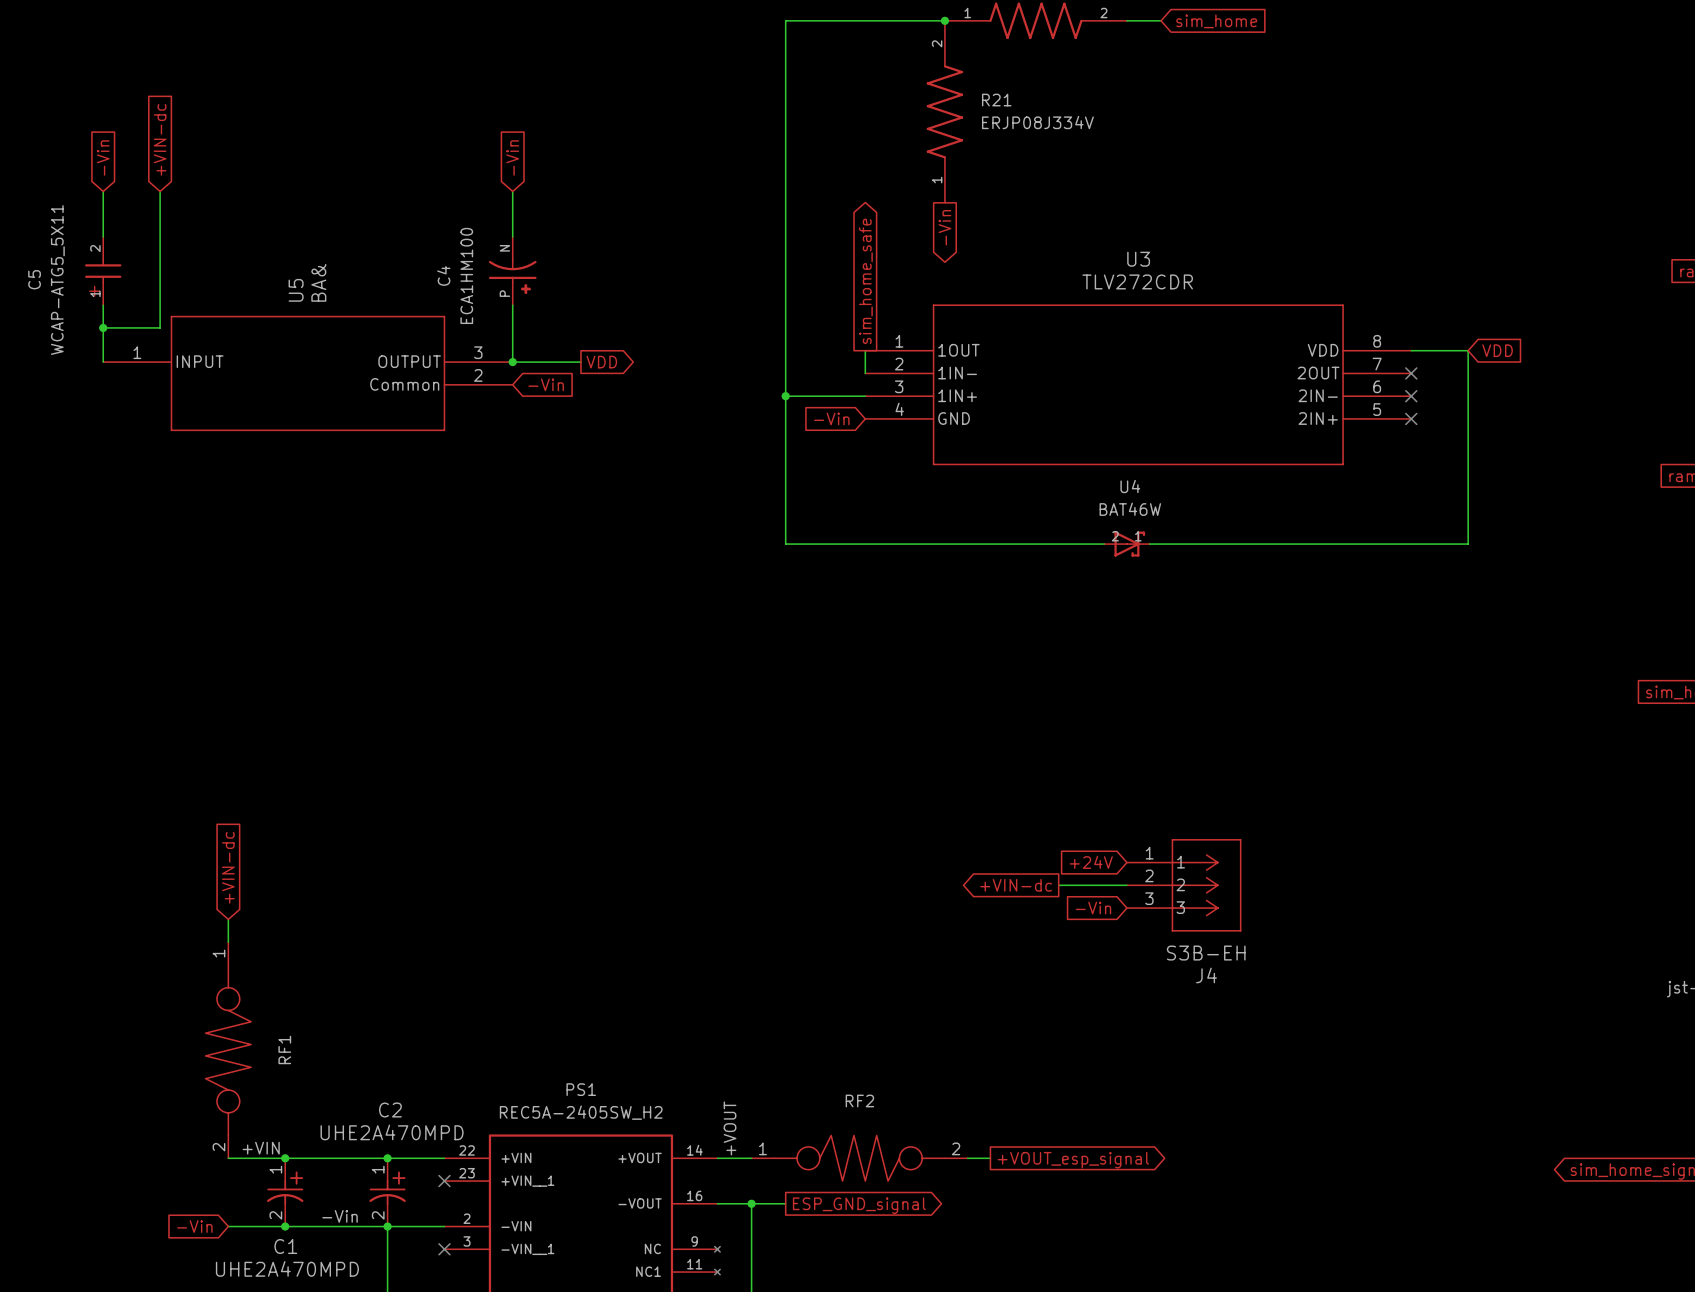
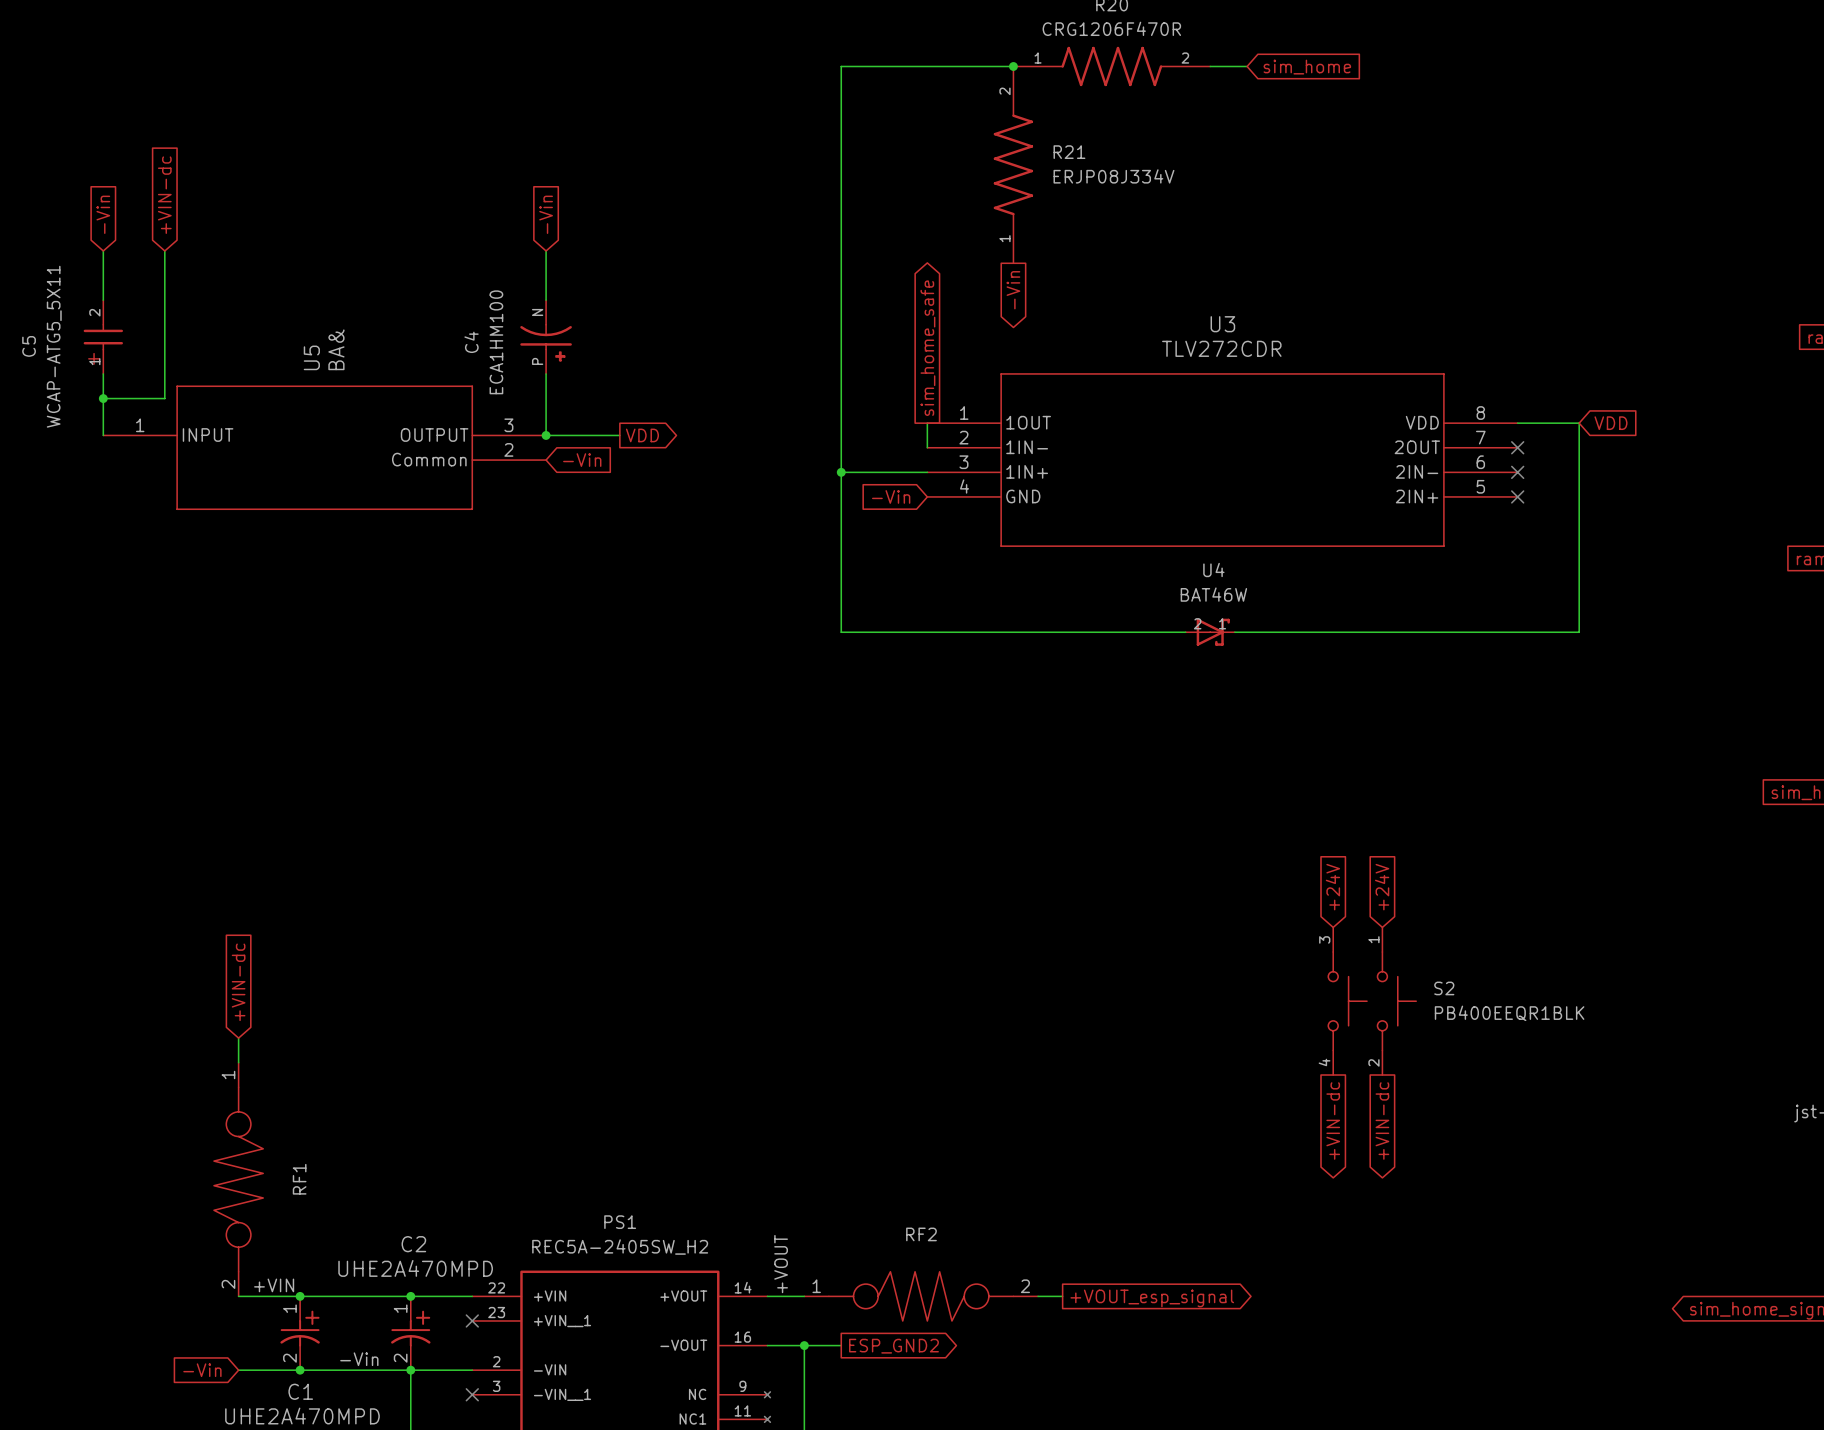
global label: none -> +24V (1332, 887)
global label: none -> +24V (1382, 887)
global label: +24V (1091, 862) -> none
global label: +VIN-dc (1016, 885) -> none
wire: (1058, 885) (1126, 885) -> none
J4: S3B-EH (1184, 885) -> none
S2: none -> PB400EEQR1BLK (1372, 1001)
global label: -Vin (1093, 908) -> none
global label: none -> +VIN-dc (1333, 1121)
global label: none -> +VIN-dc (1382, 1121)
global label: ESP_GND_signal (859, 1205) -> ESP_GND2 (893, 1346)

